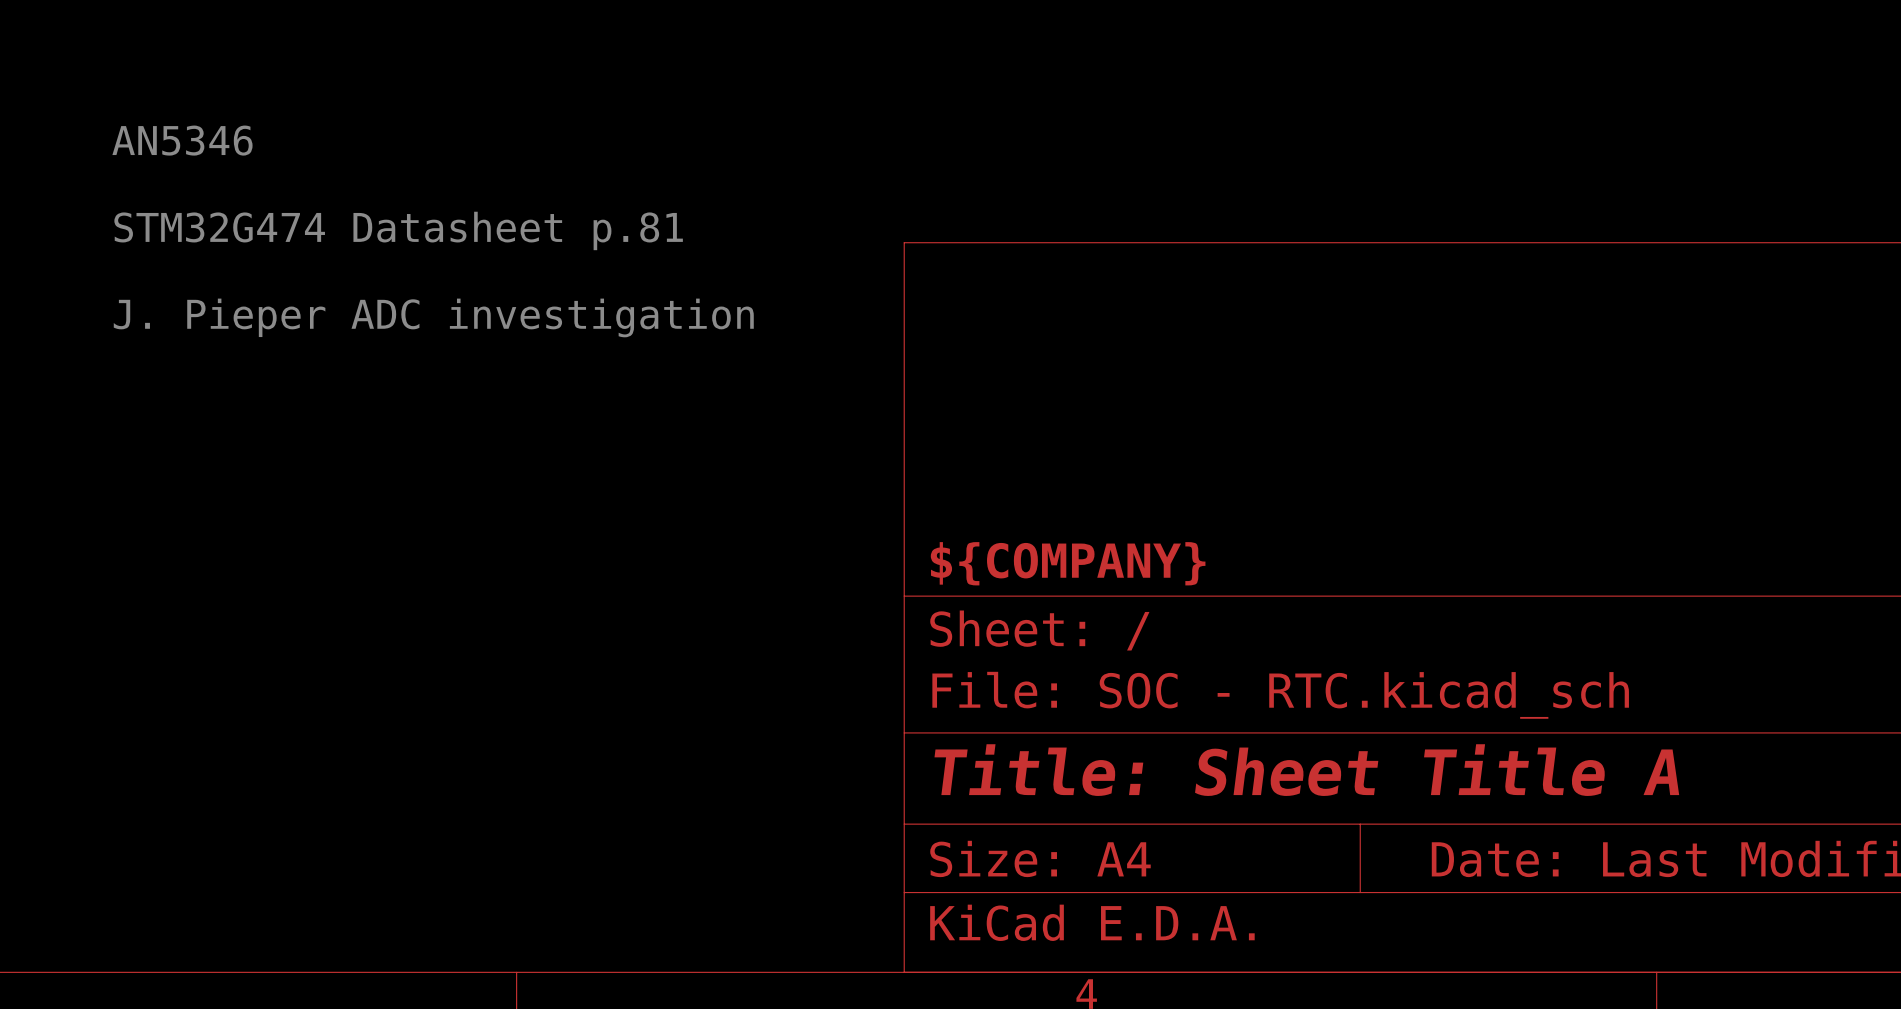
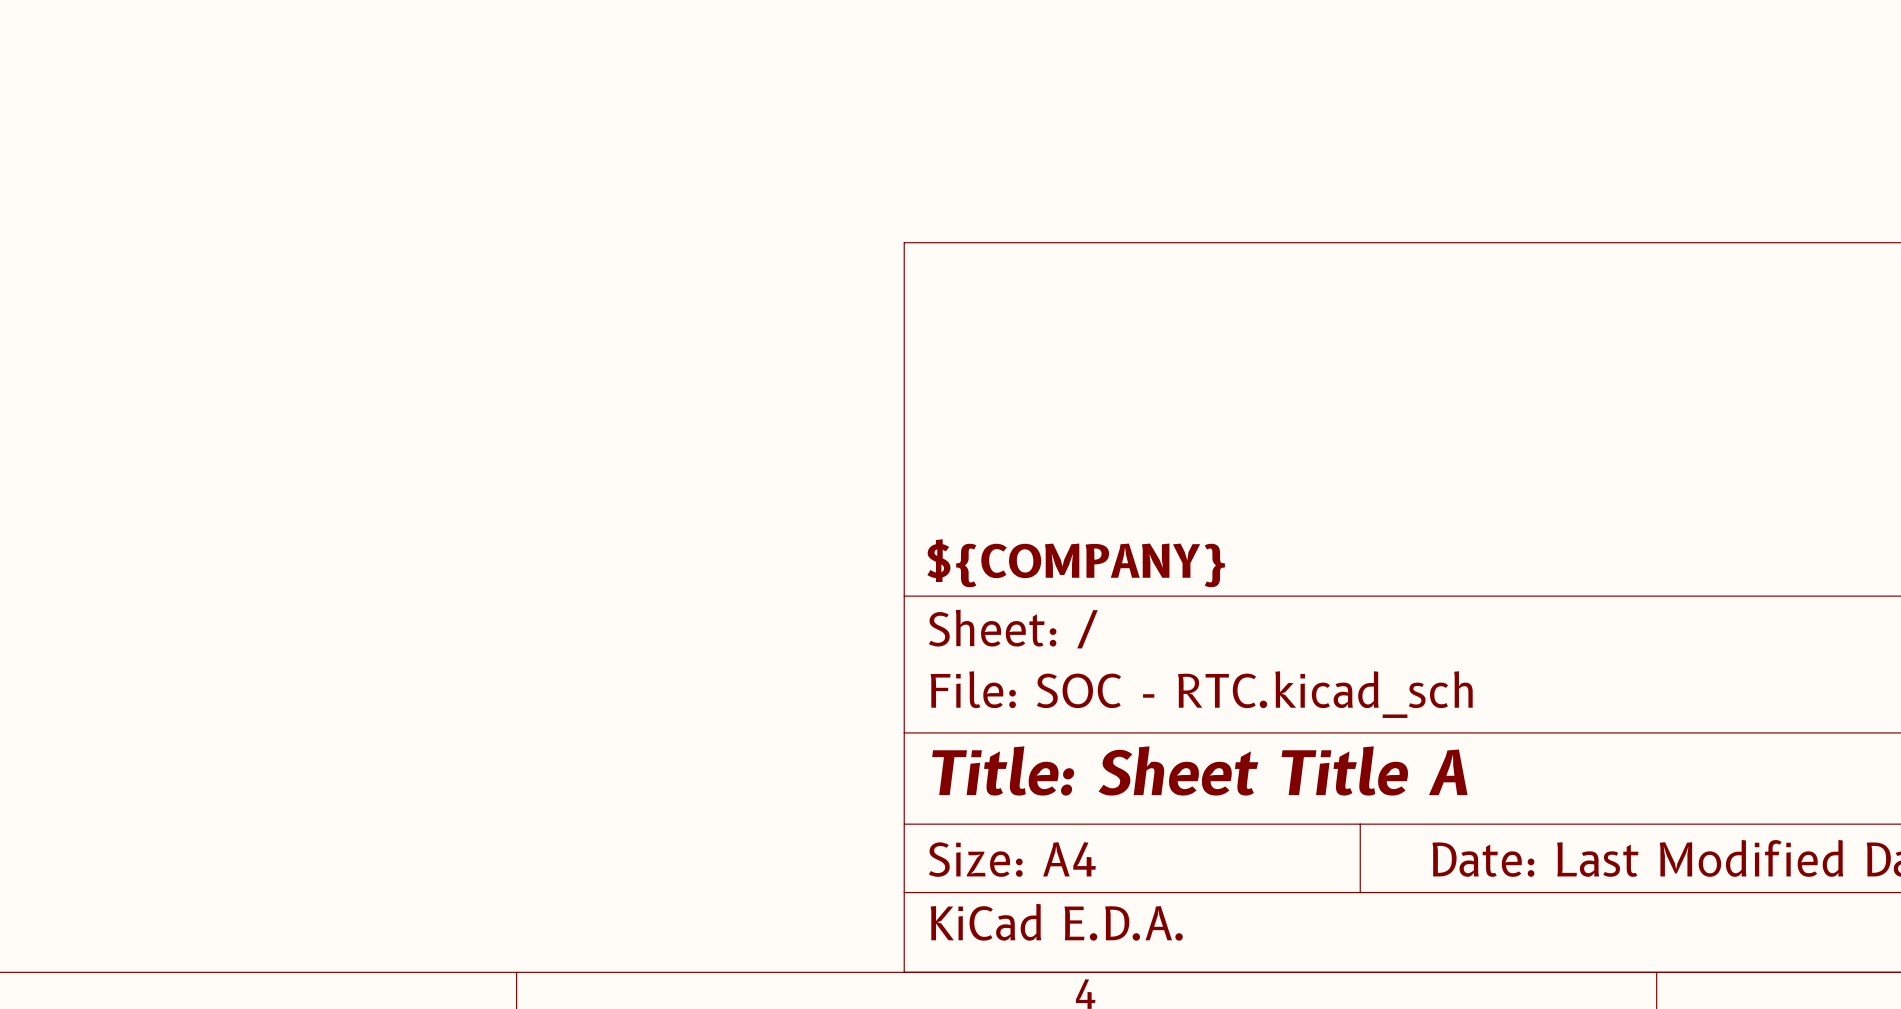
text: AN5346 (182, 140) -> none
text: STM32G474 Datasheet p.81 (398, 230) -> none
text: J. Pieper ADC investigation (433, 317) -> none

